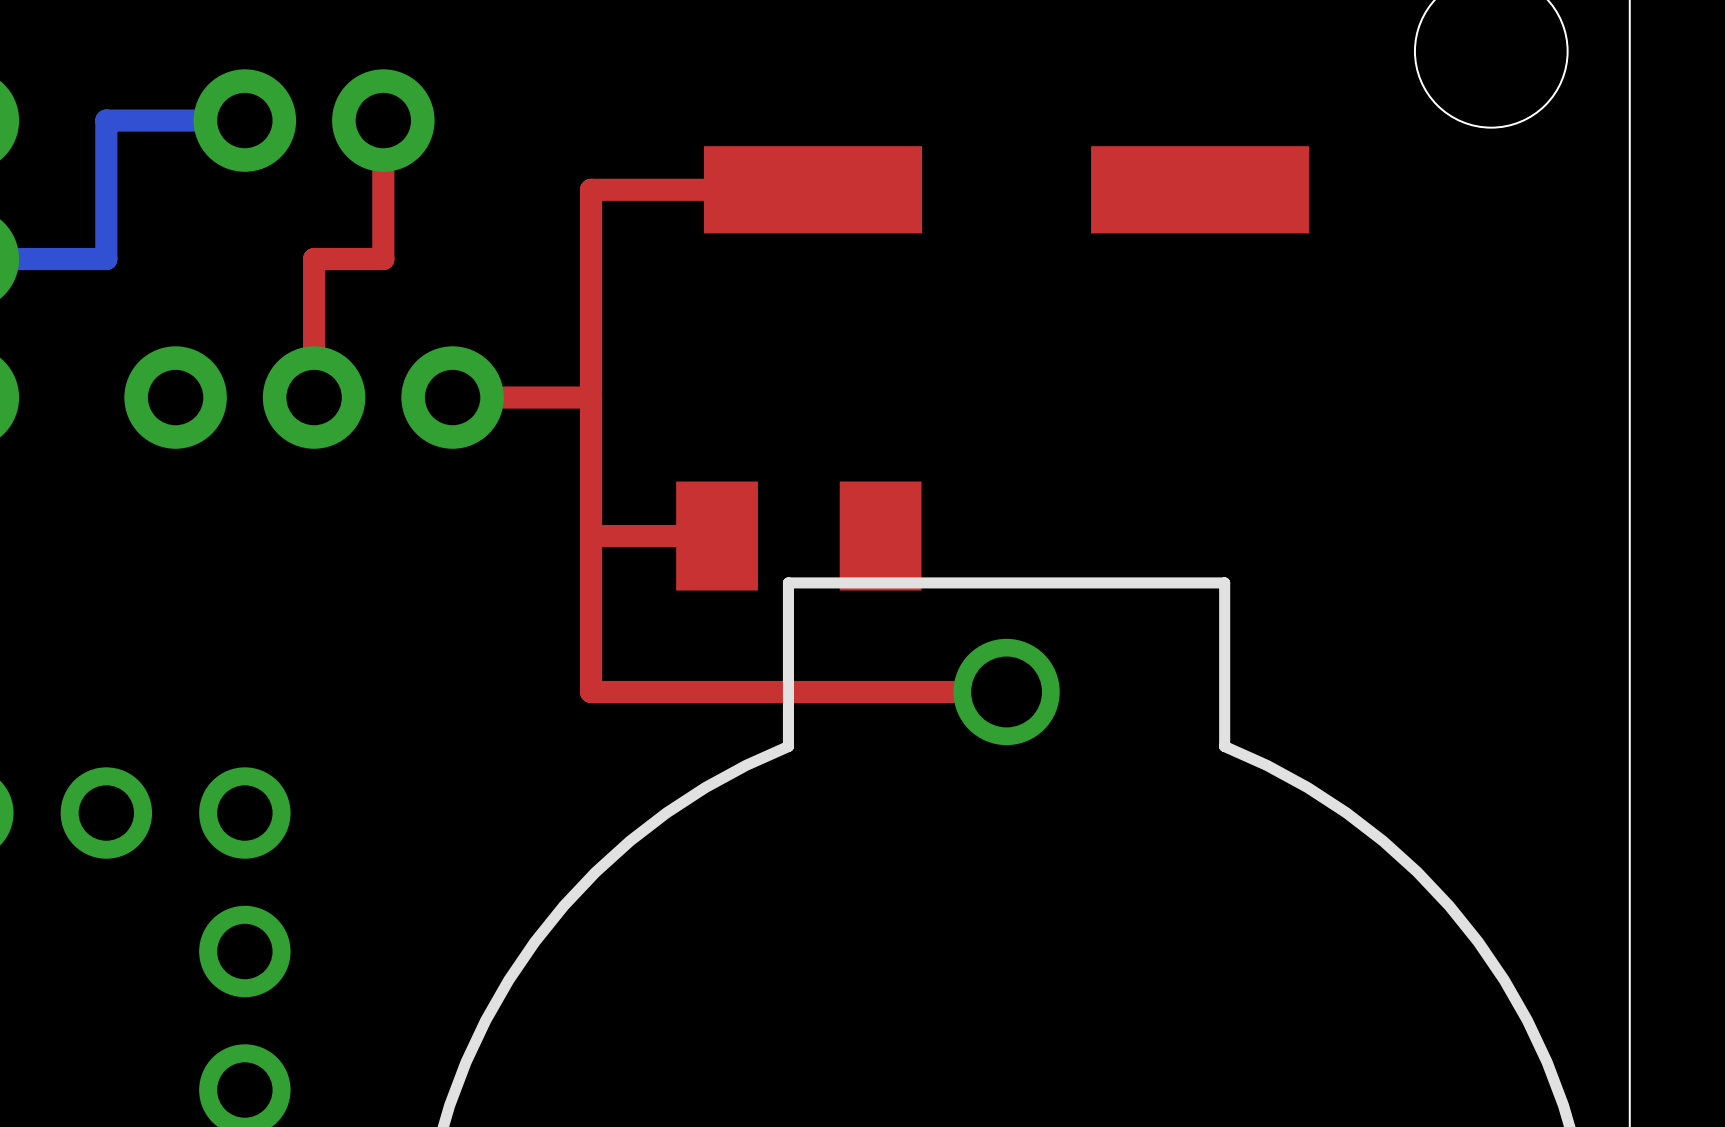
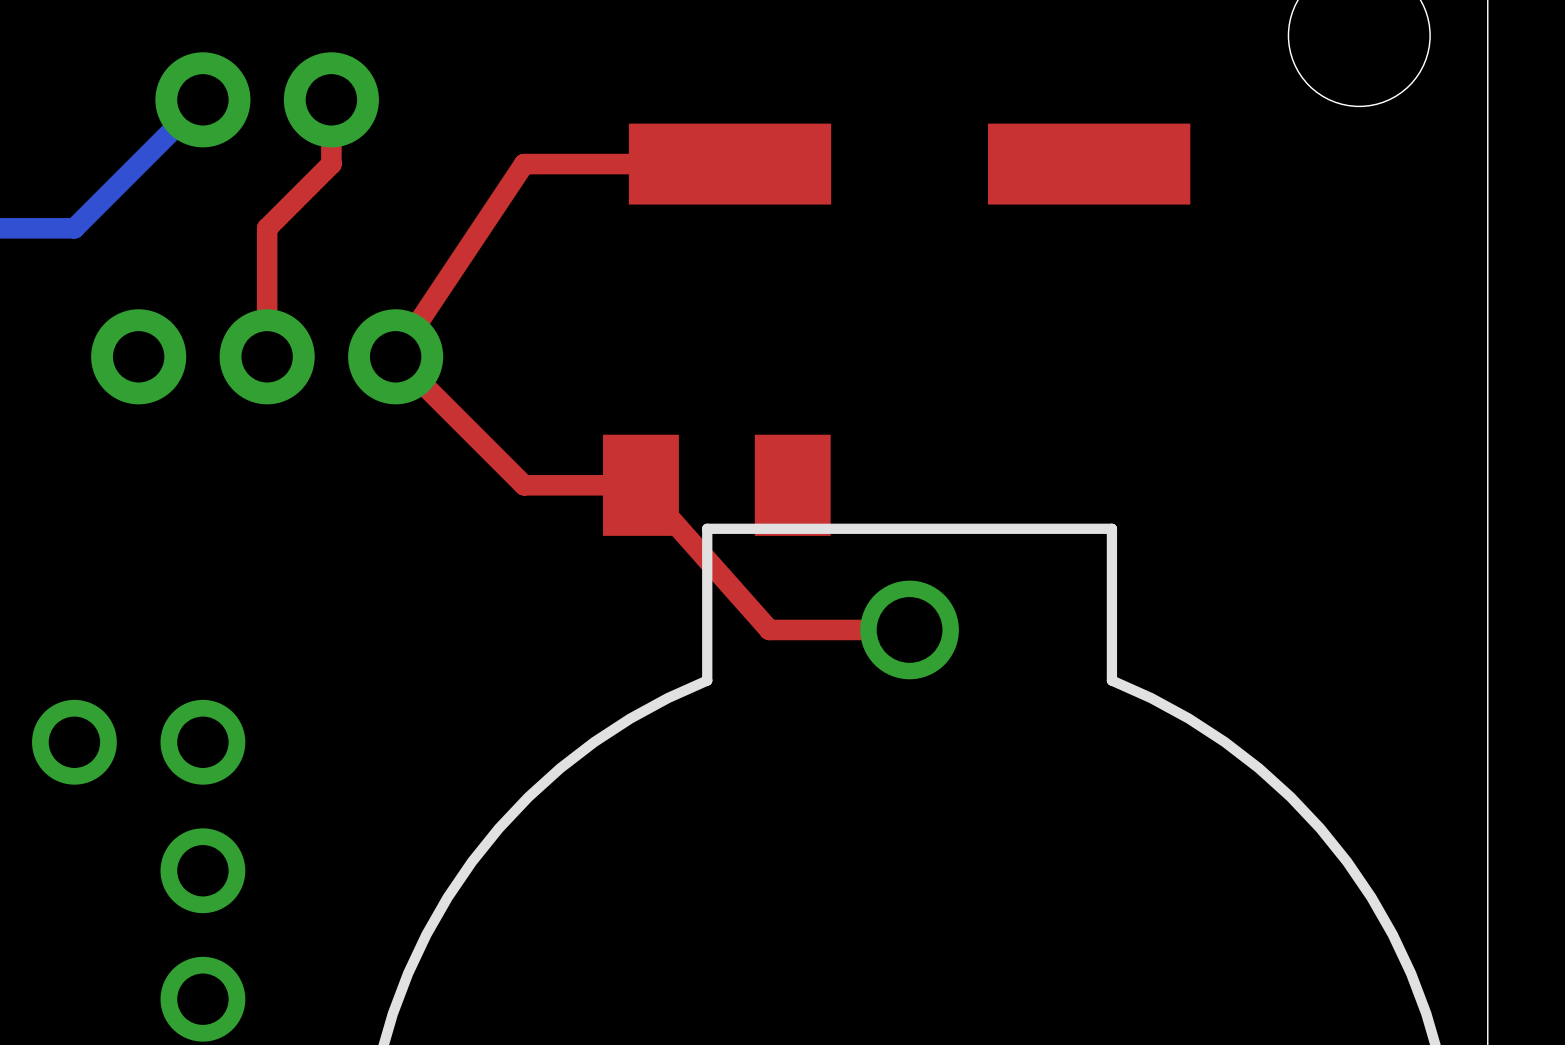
bottom track: (244, 120) (106, 120) (106, 259) -> (202, 99) (74, 228)
top track: (383, 189) (383, 259) (314, 259) -> (331, 164) (267, 228)
top track: (591, 189) (591, 691) (855, 691) -> (524, 164) (395, 356) (524, 485)
top track: (591, 397) (452, 397) -> none
top track: none -> (640, 485) (769, 629)

